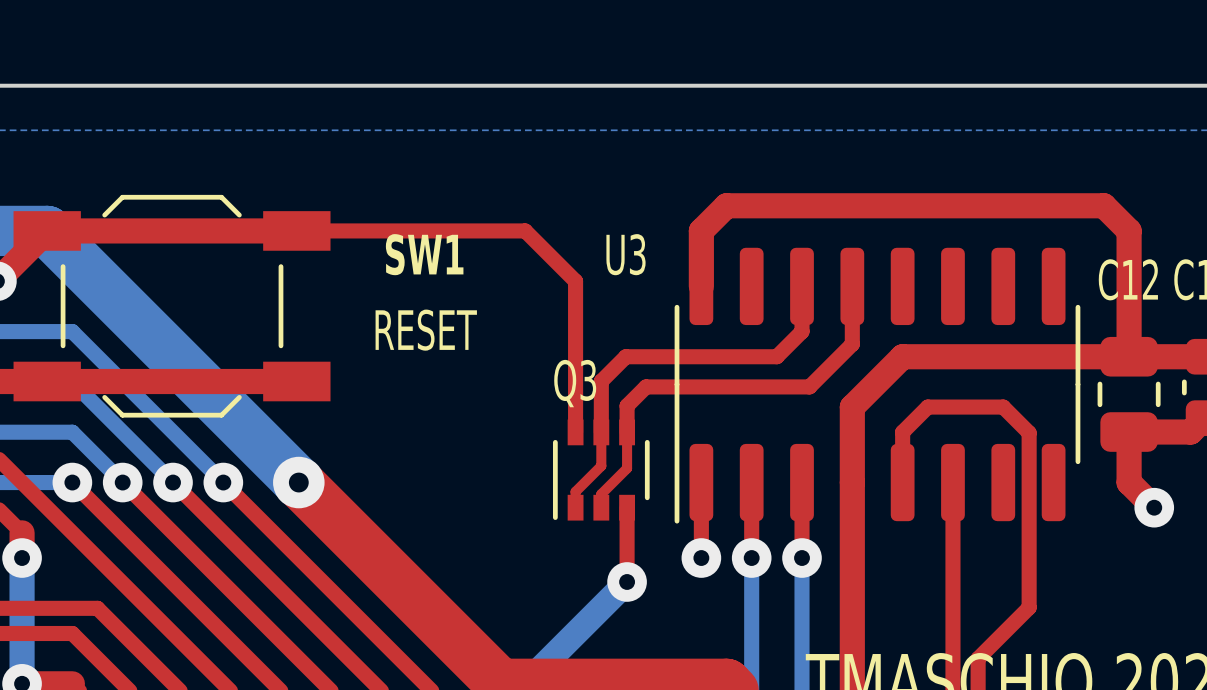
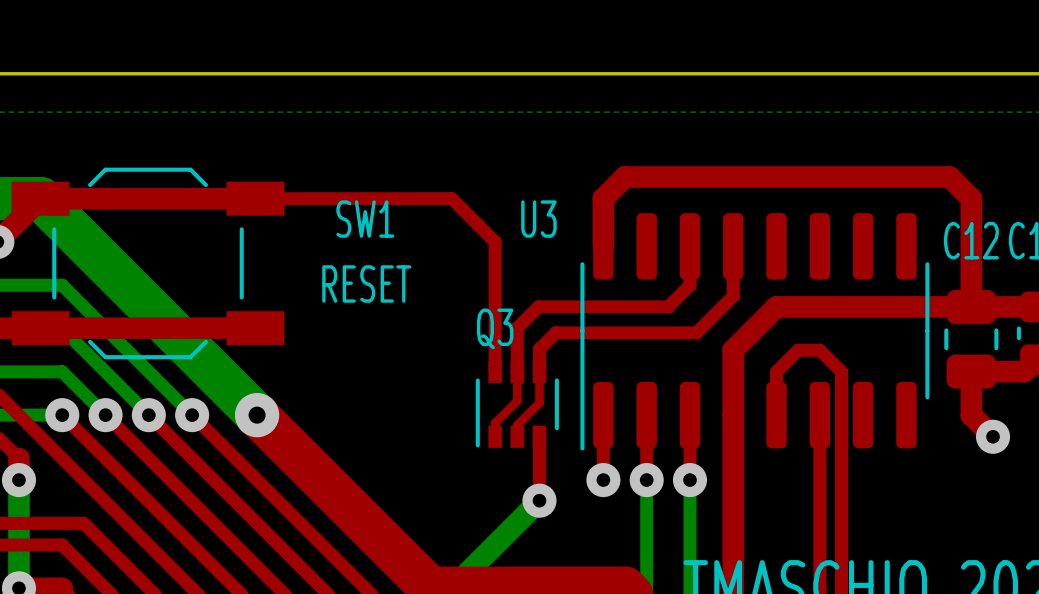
top track: (952, 407) (1003, 407) (1029, 432) (1029, 607) (978, 658) -> (819, 350) (841, 371) (841, 566)

